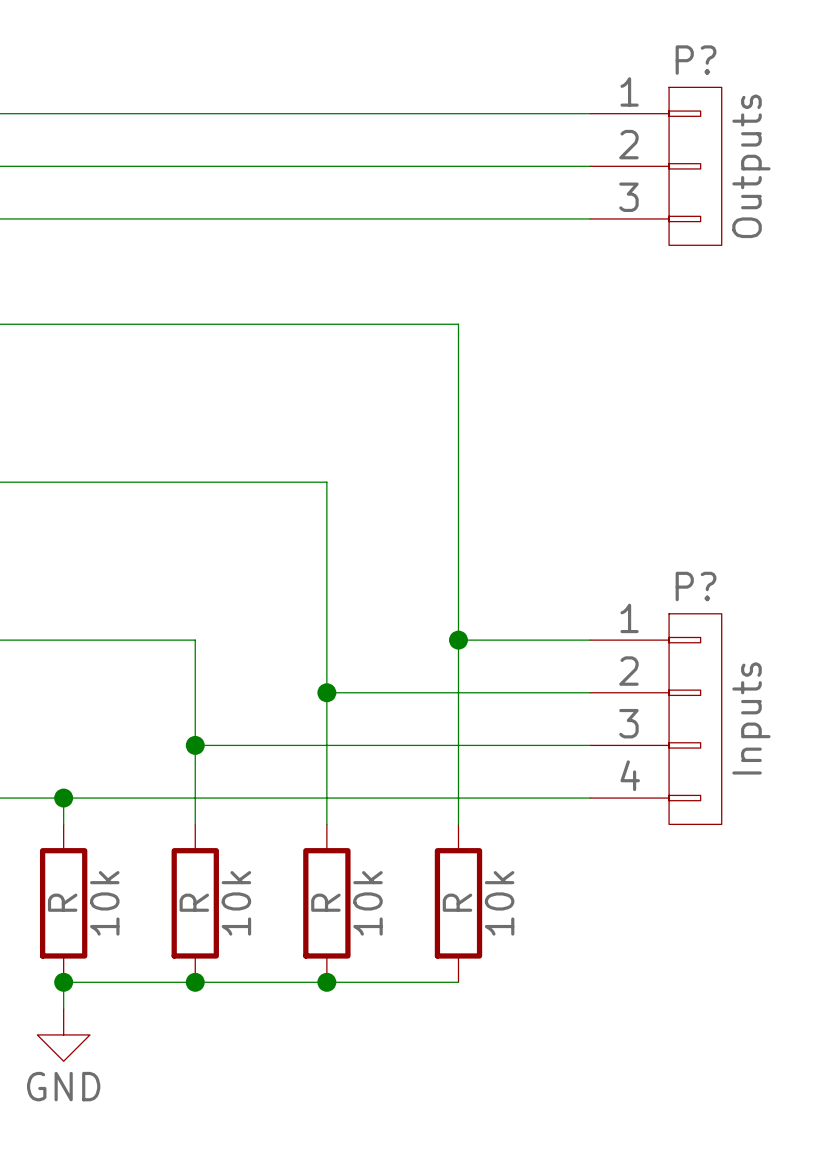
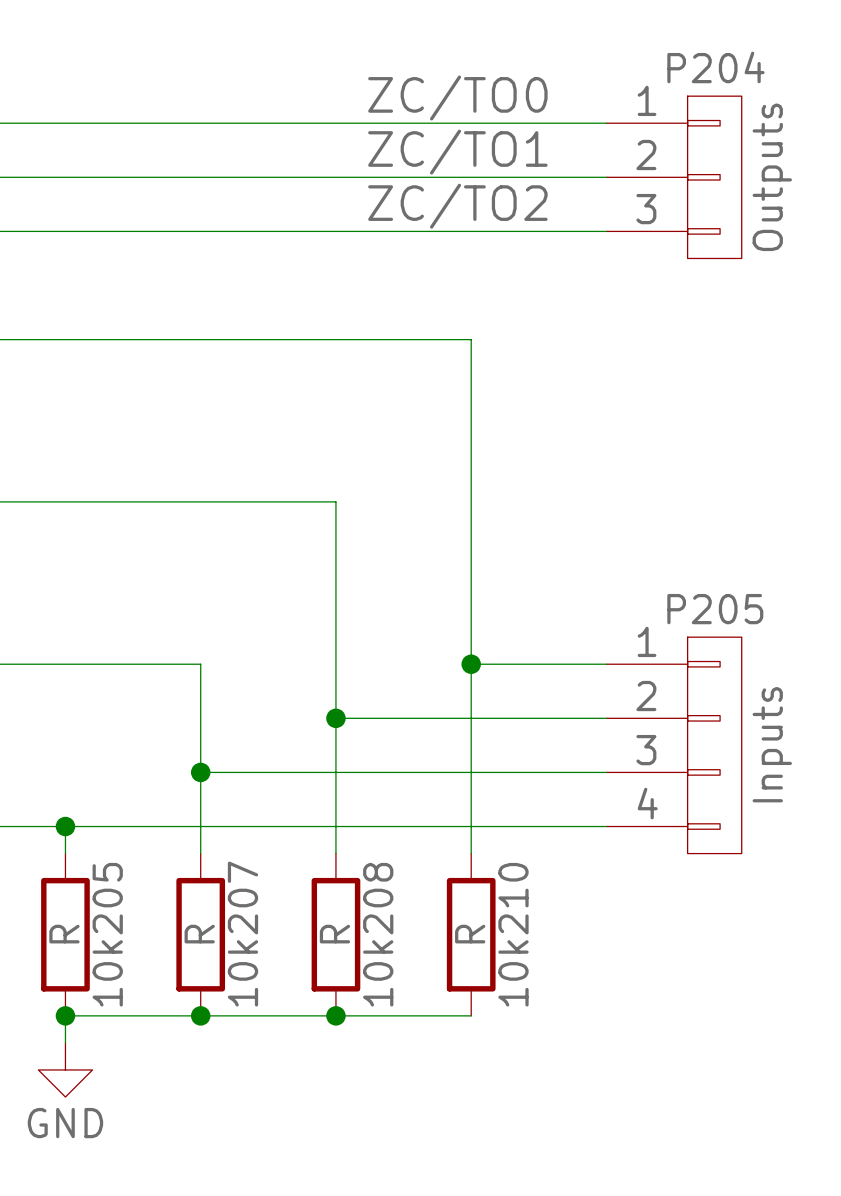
P? name: P? (696, 60) -> P204 (715, 67)
label: none -> ZC/TO0 (457, 97)
label: none -> ZC/TO1 (457, 152)
label: none -> ZC/TO2 (457, 206)
P? name: P? (696, 586) -> P205 (715, 609)
10k name: 10k (104, 903) -> 10k205 (107, 934)
10k name: 10k (236, 903) -> 10k207 (242, 934)
10k name: 10k (368, 903) -> 10k208 (378, 934)
10k name: 10k (499, 903) -> 10k210 (513, 934)

